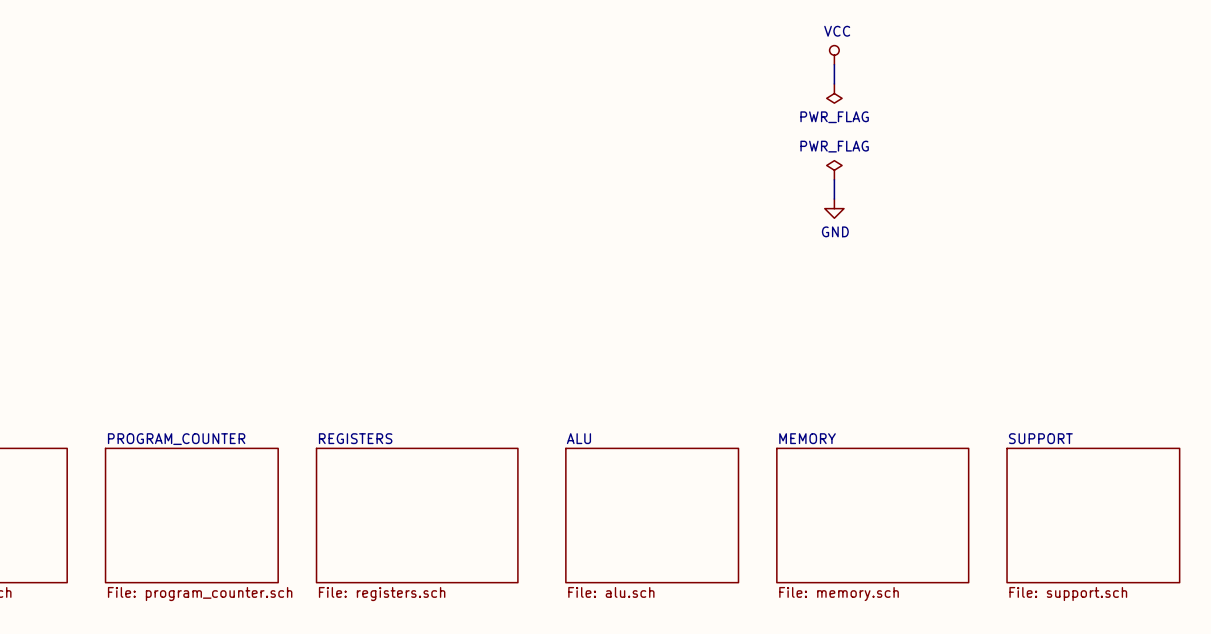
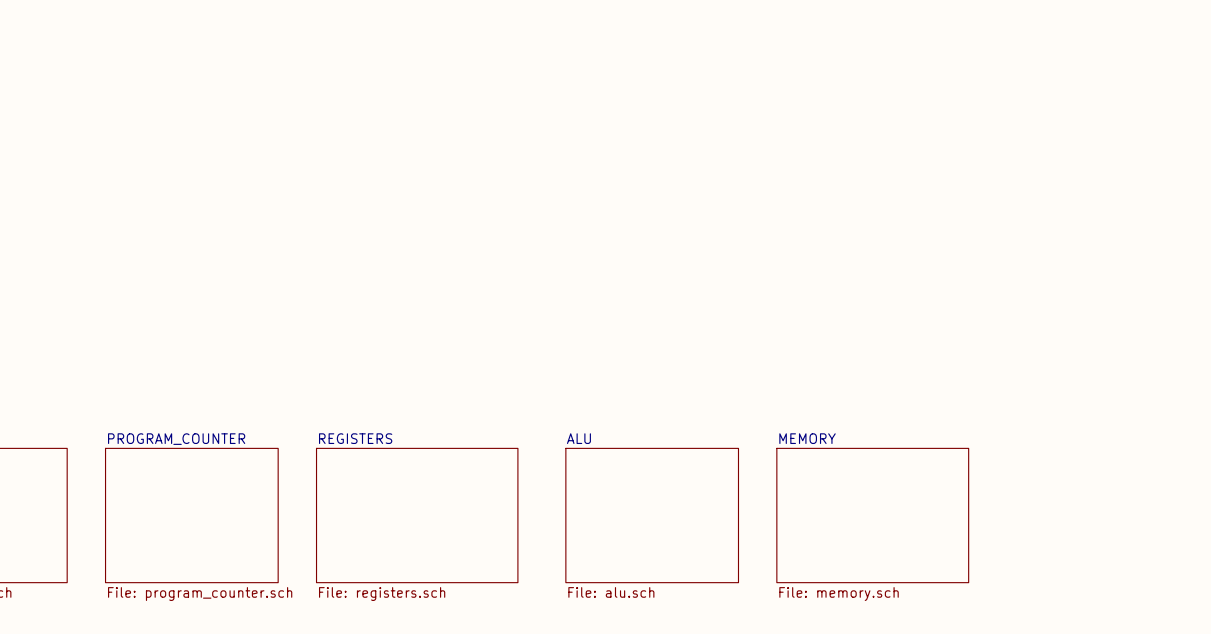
power symbol: VCC (834, 55) -> none
wire: (834, 64) (834, 83) -> none
power symbol: PWR_FLAG (834, 93) -> none
power symbol: PWR_FLAG (834, 170) -> none
wire: (834, 179) (834, 199) -> none
power symbol: GND (834, 208) -> none
sheet SUPPORT: File: support.sch (1093, 515) -> none

